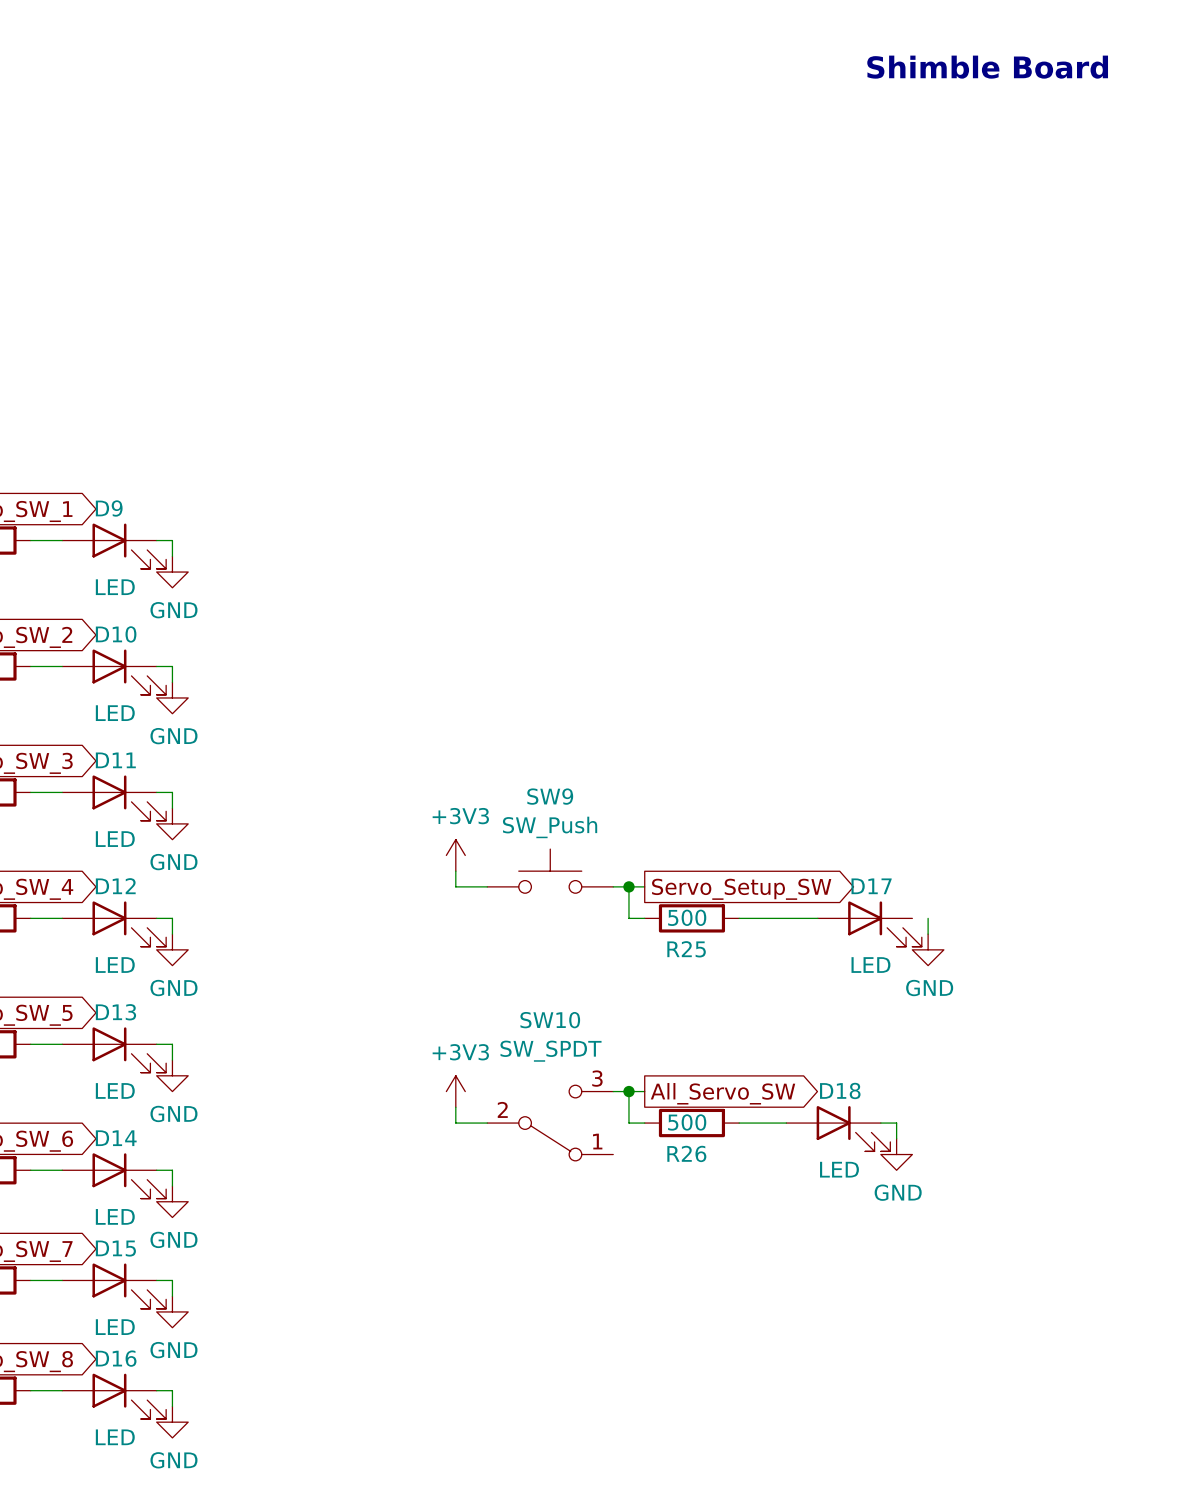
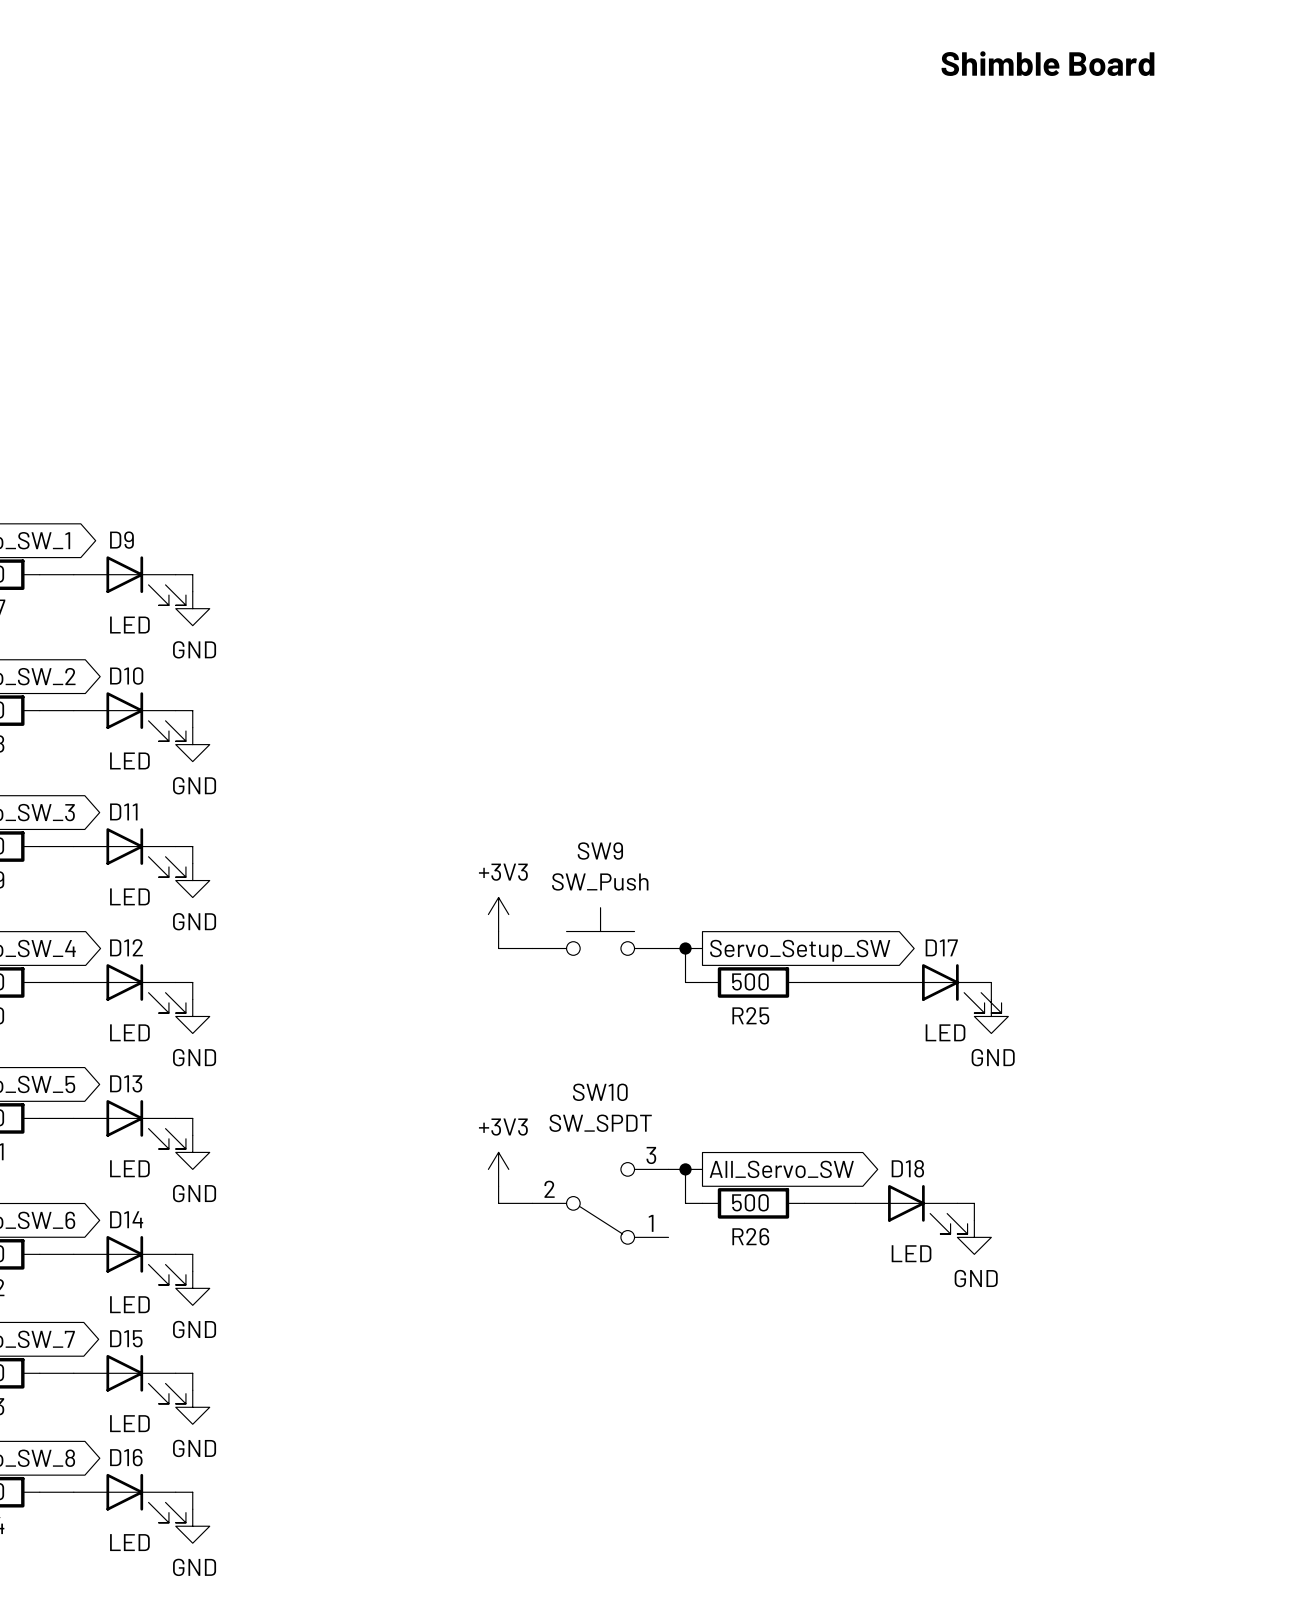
wire: (928, 918) (928, 934) -> (991, 982) (991, 999)
power symbol position: GND (928, 949) -> GND (991, 1016)

